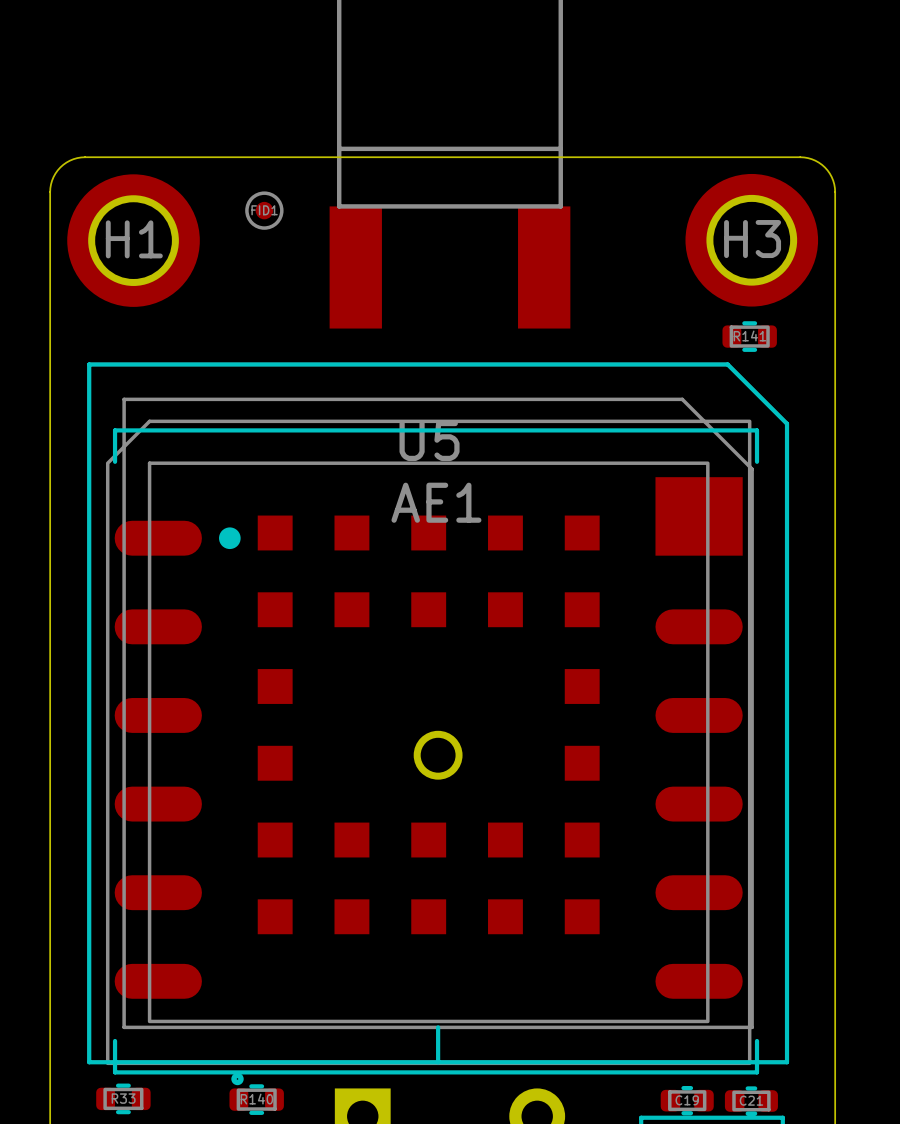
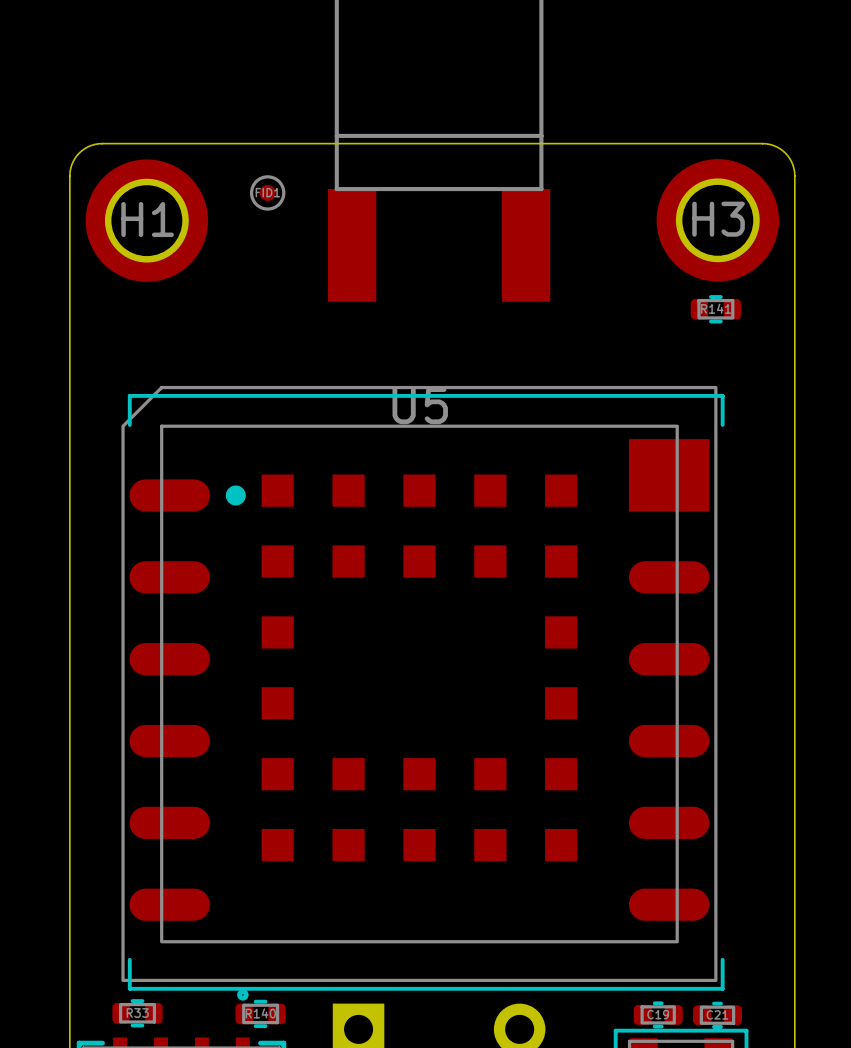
AE1: (438, 713) -> none

